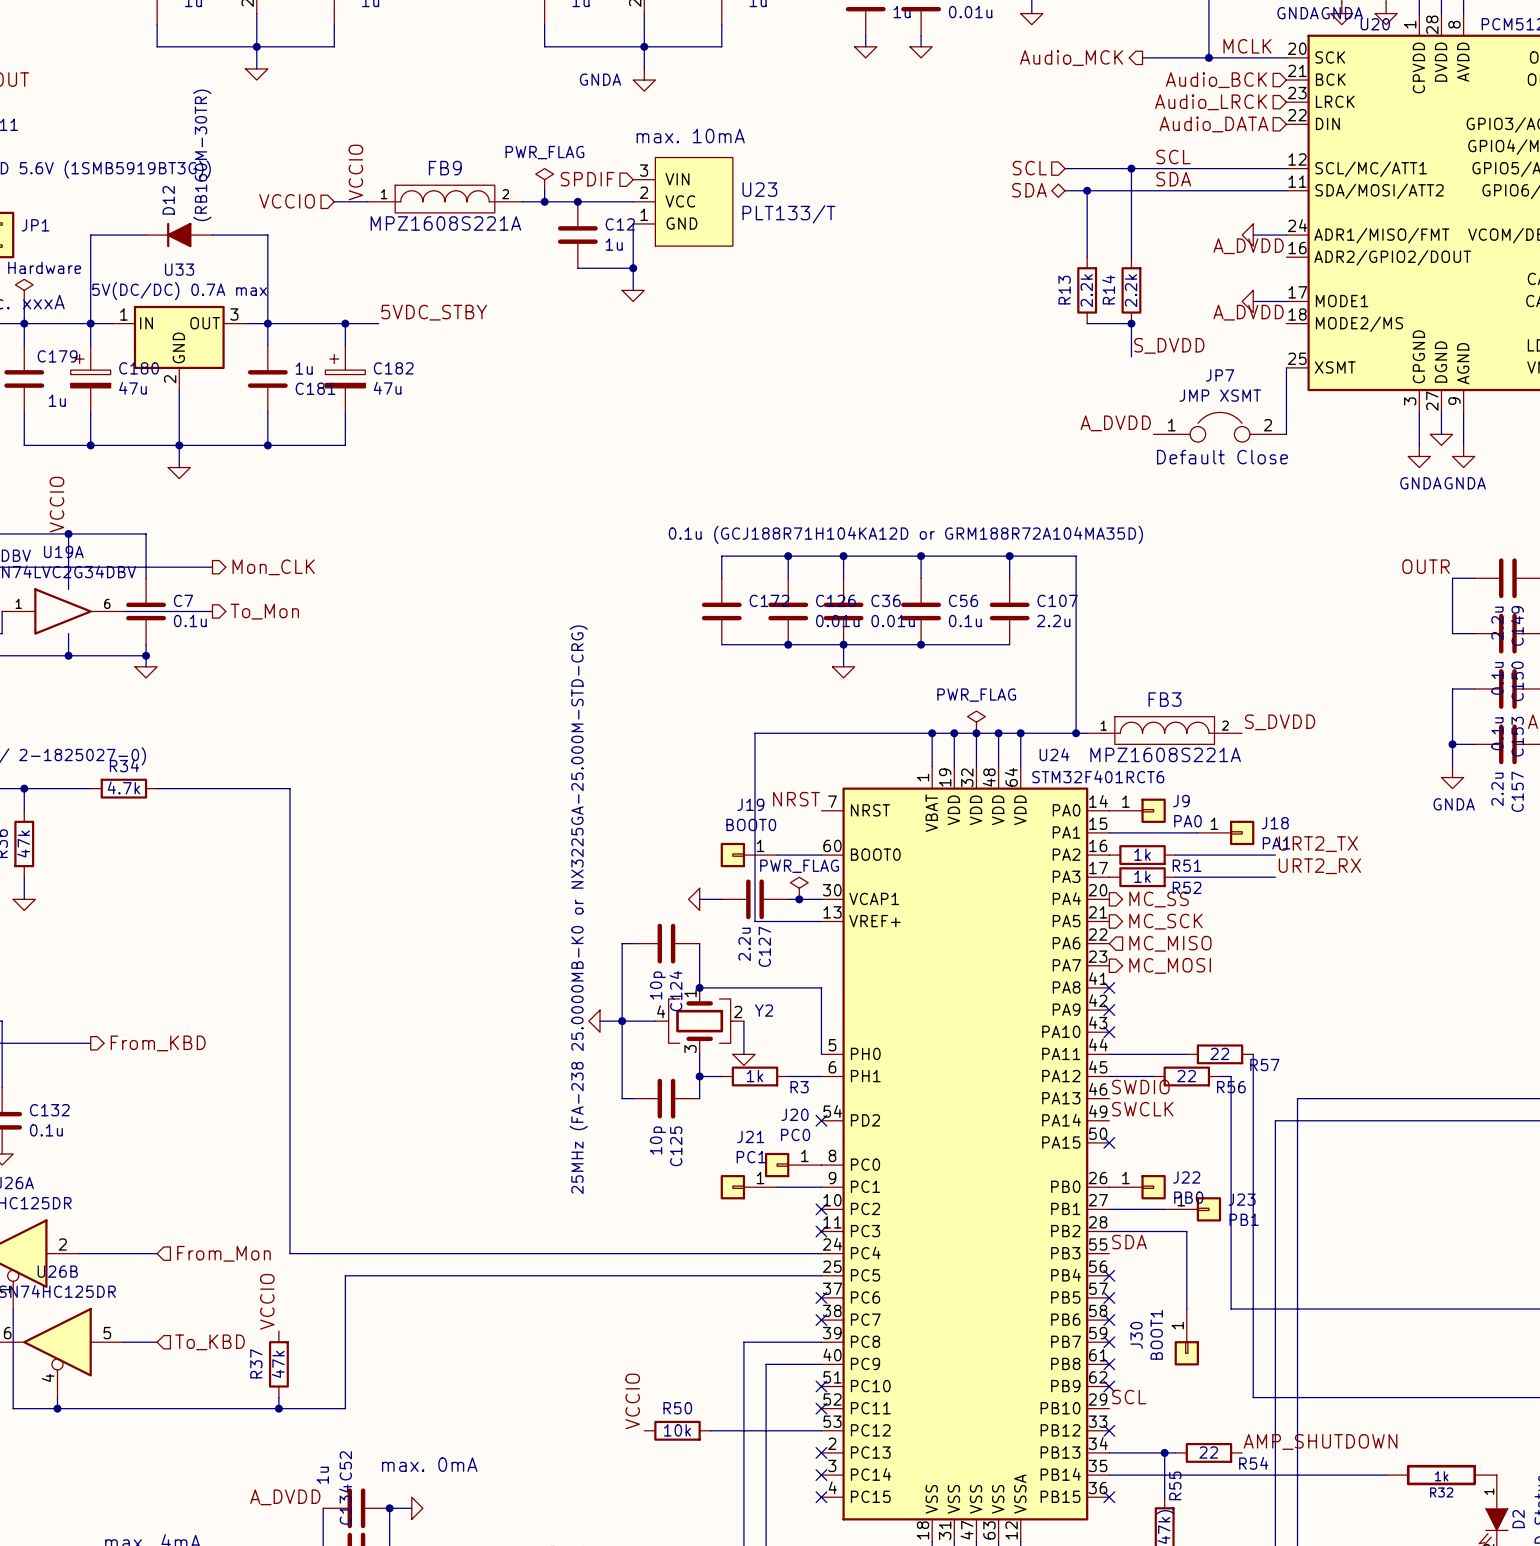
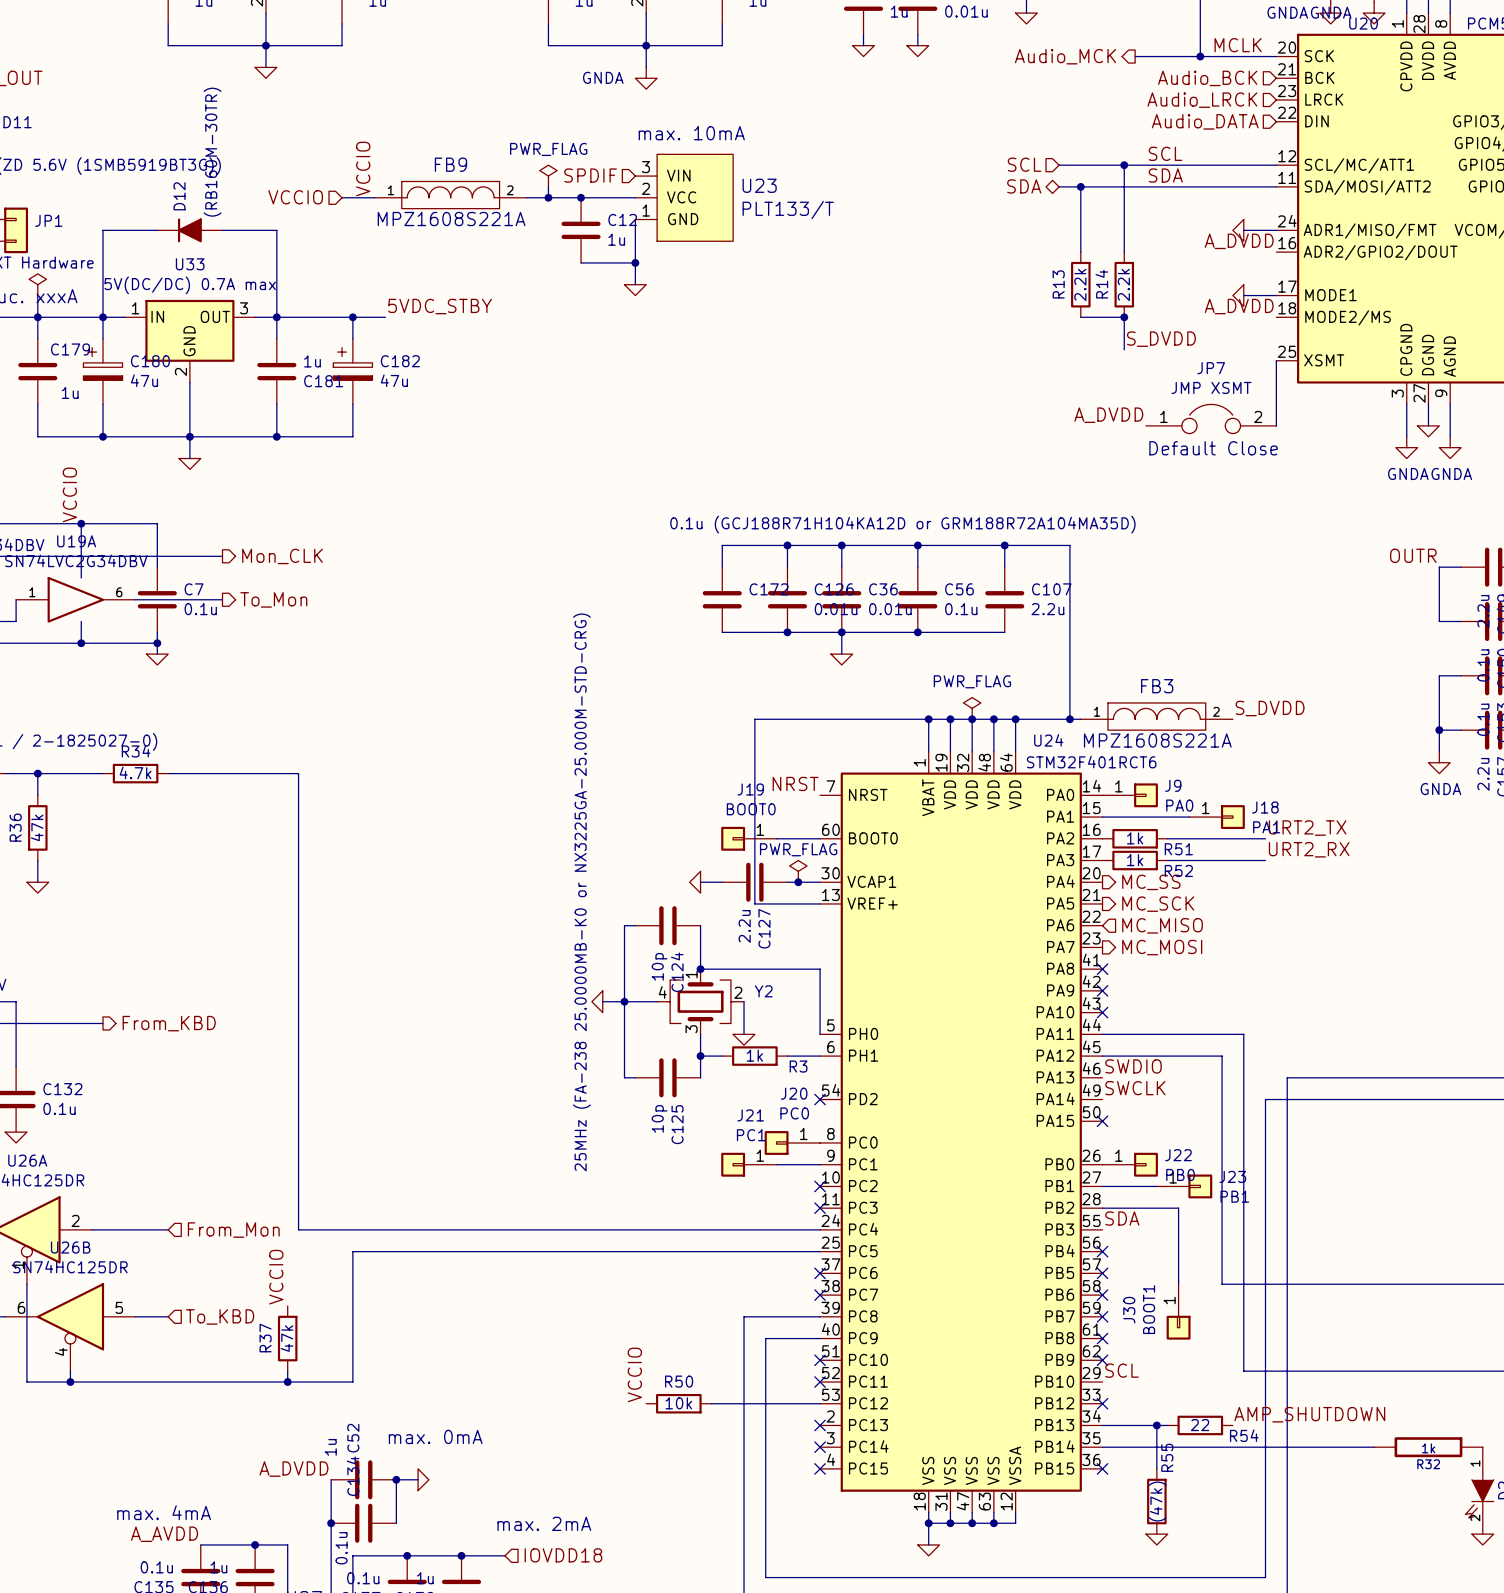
wire: none -> (1178, 1034) (1243, 1034)
R57: 22 (1220, 1054) -> none
wire: none -> (1145, 1056) (1211, 1056)
R56: 22 (1186, 1076) -> none

